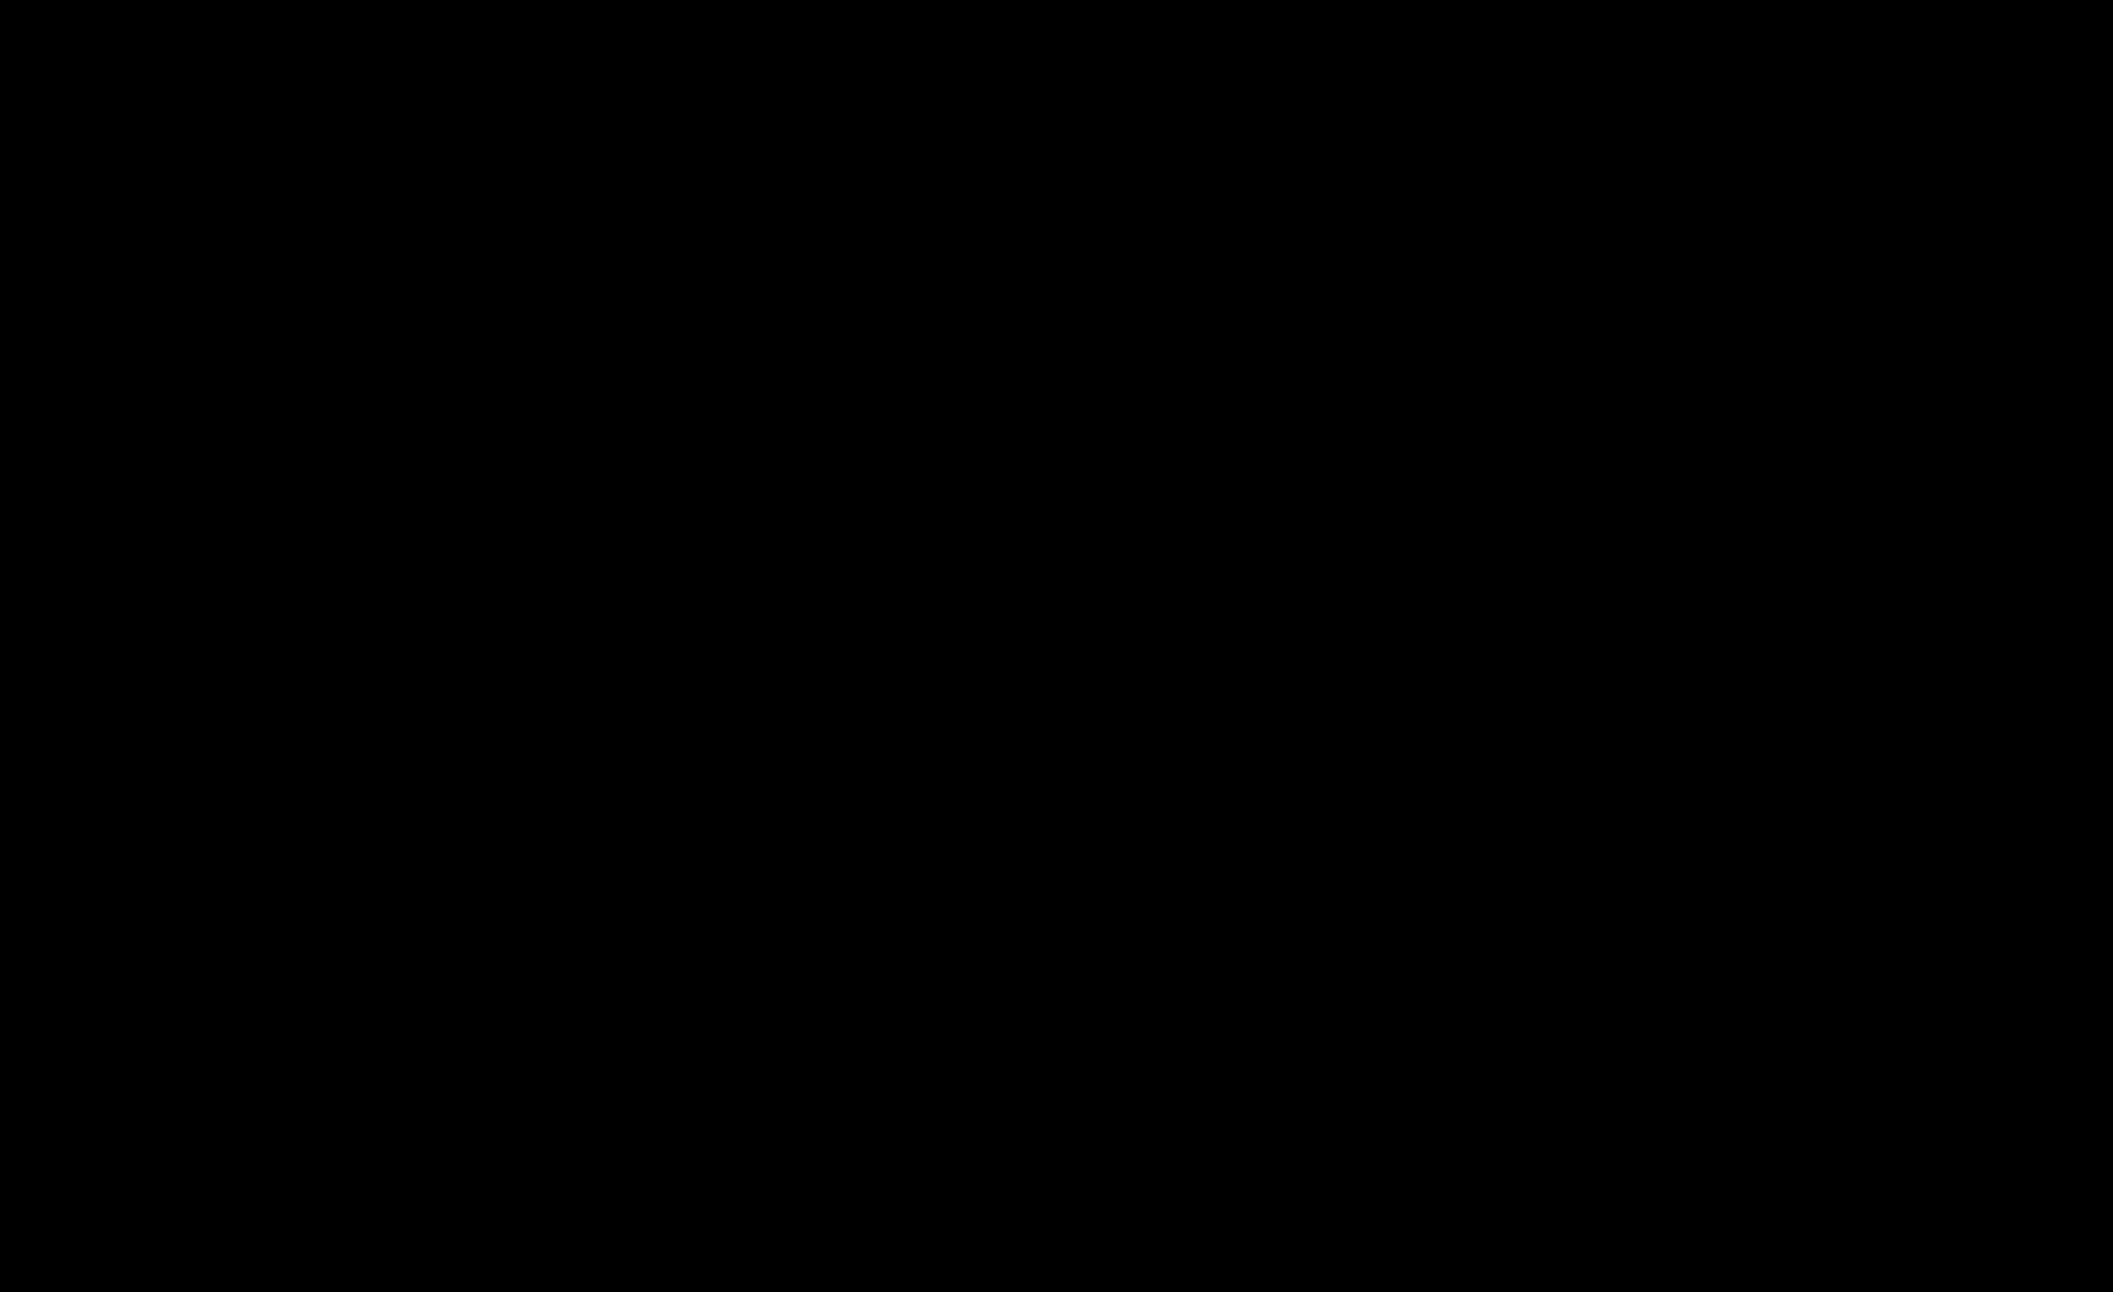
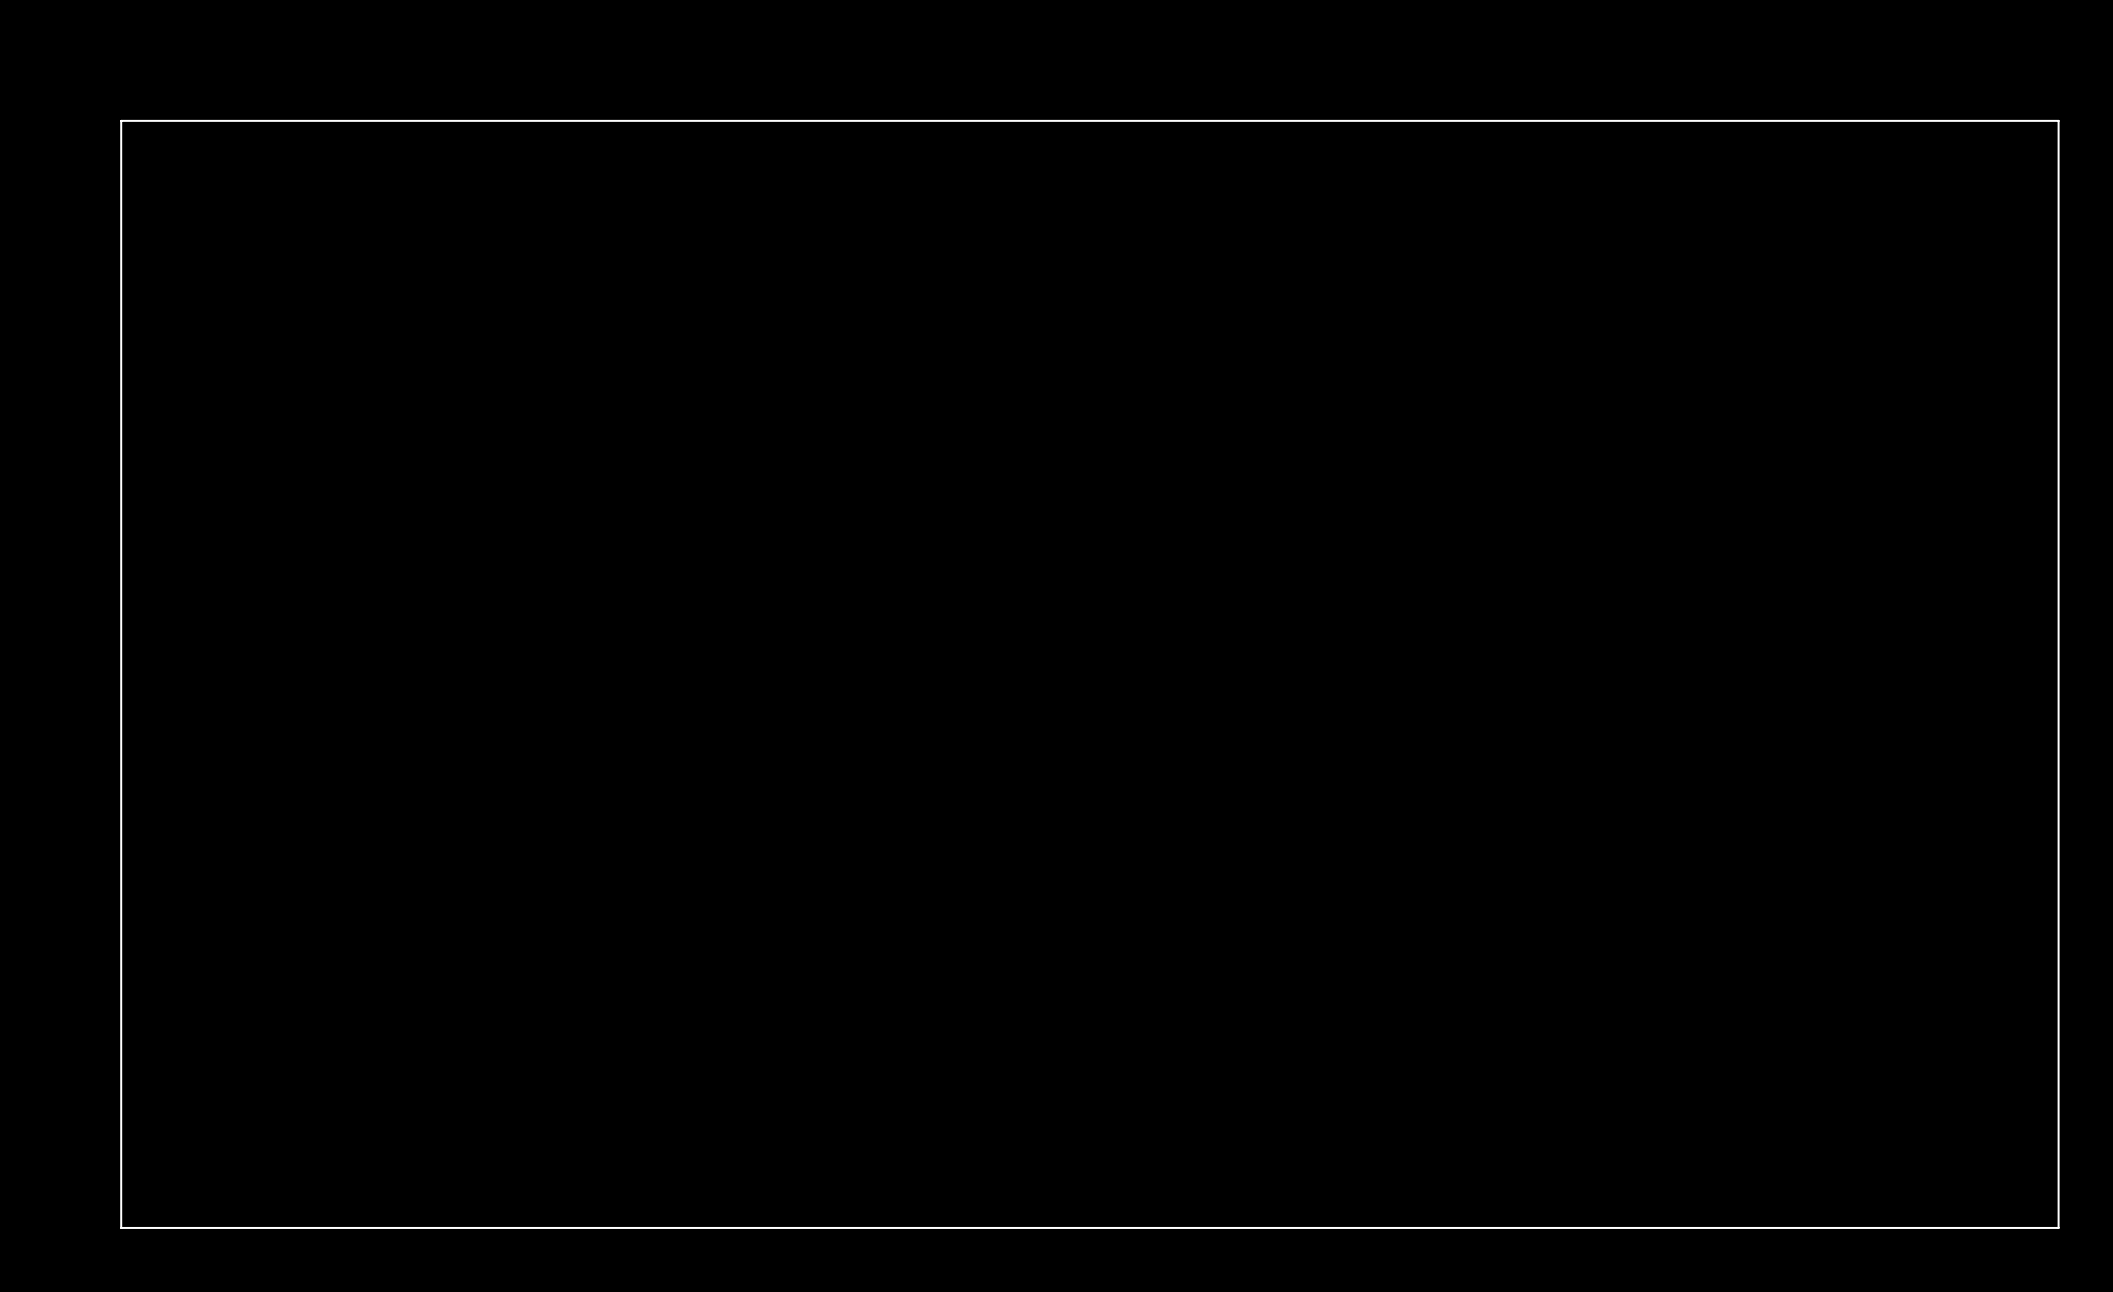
board edge: none -> (2058, 120) (121, 120) (121, 1227) (2058, 1227) (2058, 120)

